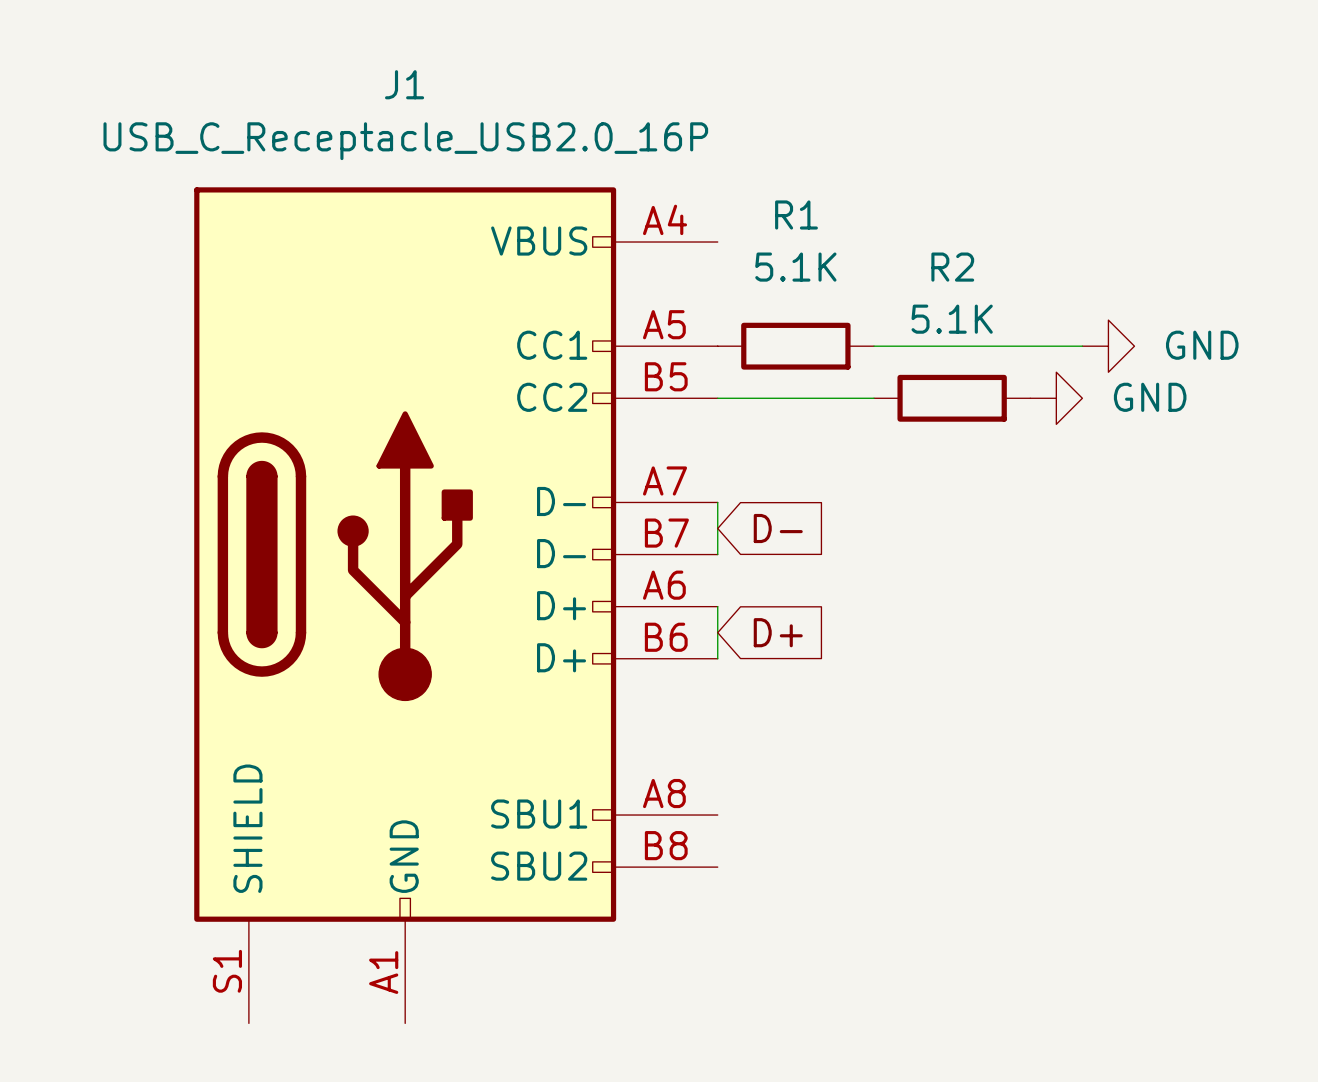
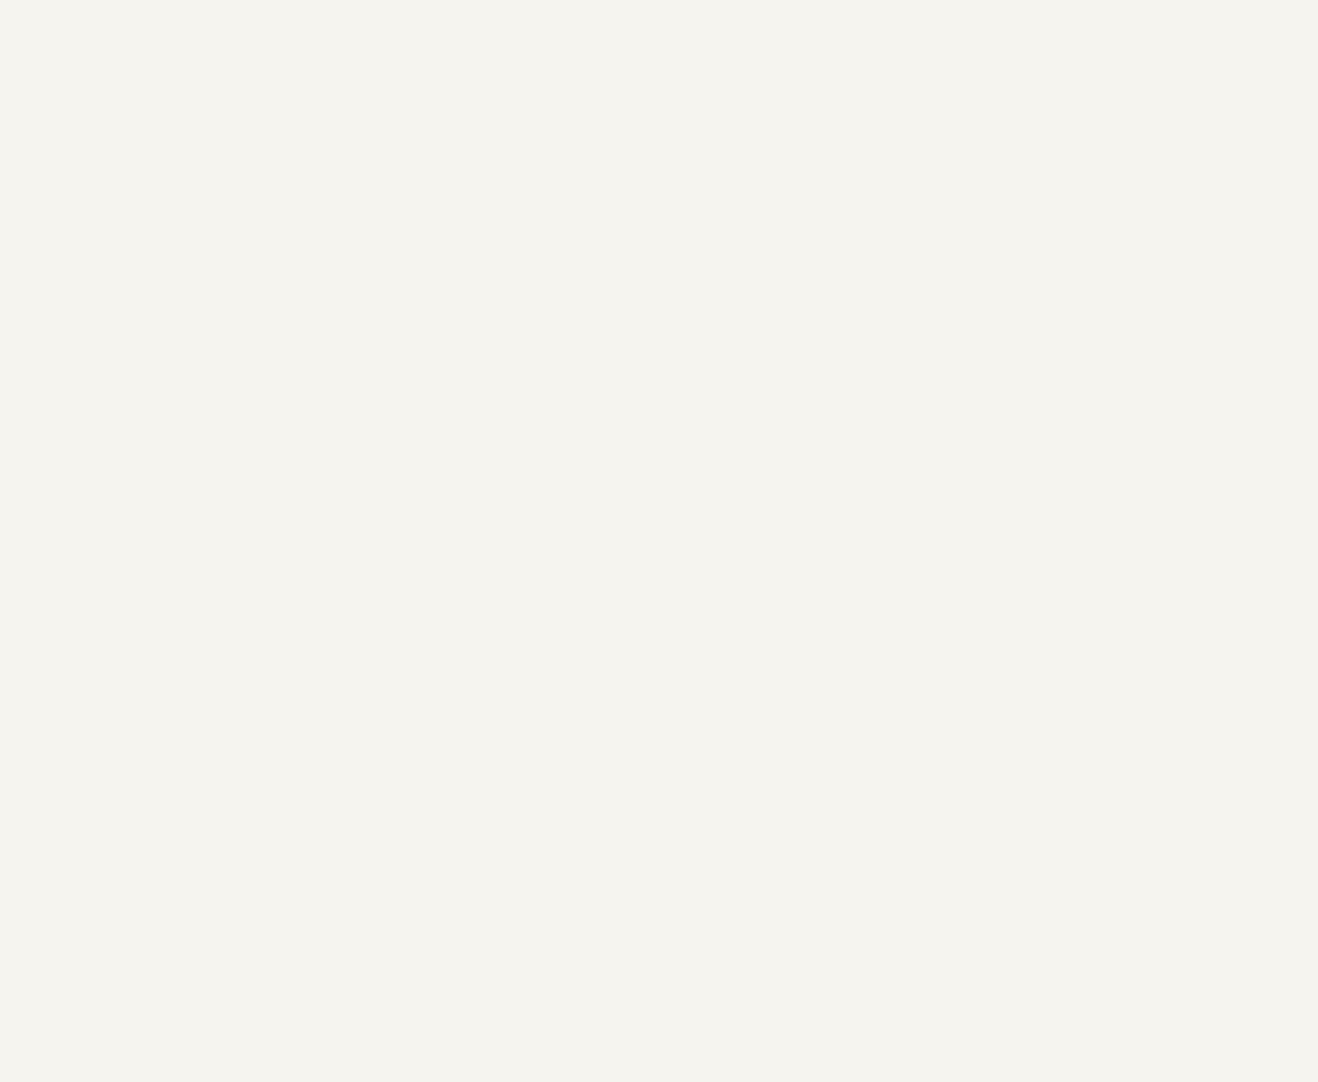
R1: 5.1K (795, 346) -> none
wire: (874, 346) (1082, 346) -> none
power symbol: GND (1108, 346) -> none
wire: (717, 398) (874, 398) -> none
R2: 5.1K (952, 398) -> none
power symbol: GND (1056, 398) -> none
wire: (717, 502) (717, 554) -> none
global label: D- (778, 528) -> none
J1: USB_C_Receptacle_USB2.0_16P (455, 605) -> none
wire: (717, 606) (717, 658) -> none
global label: D+ (778, 632) -> none

